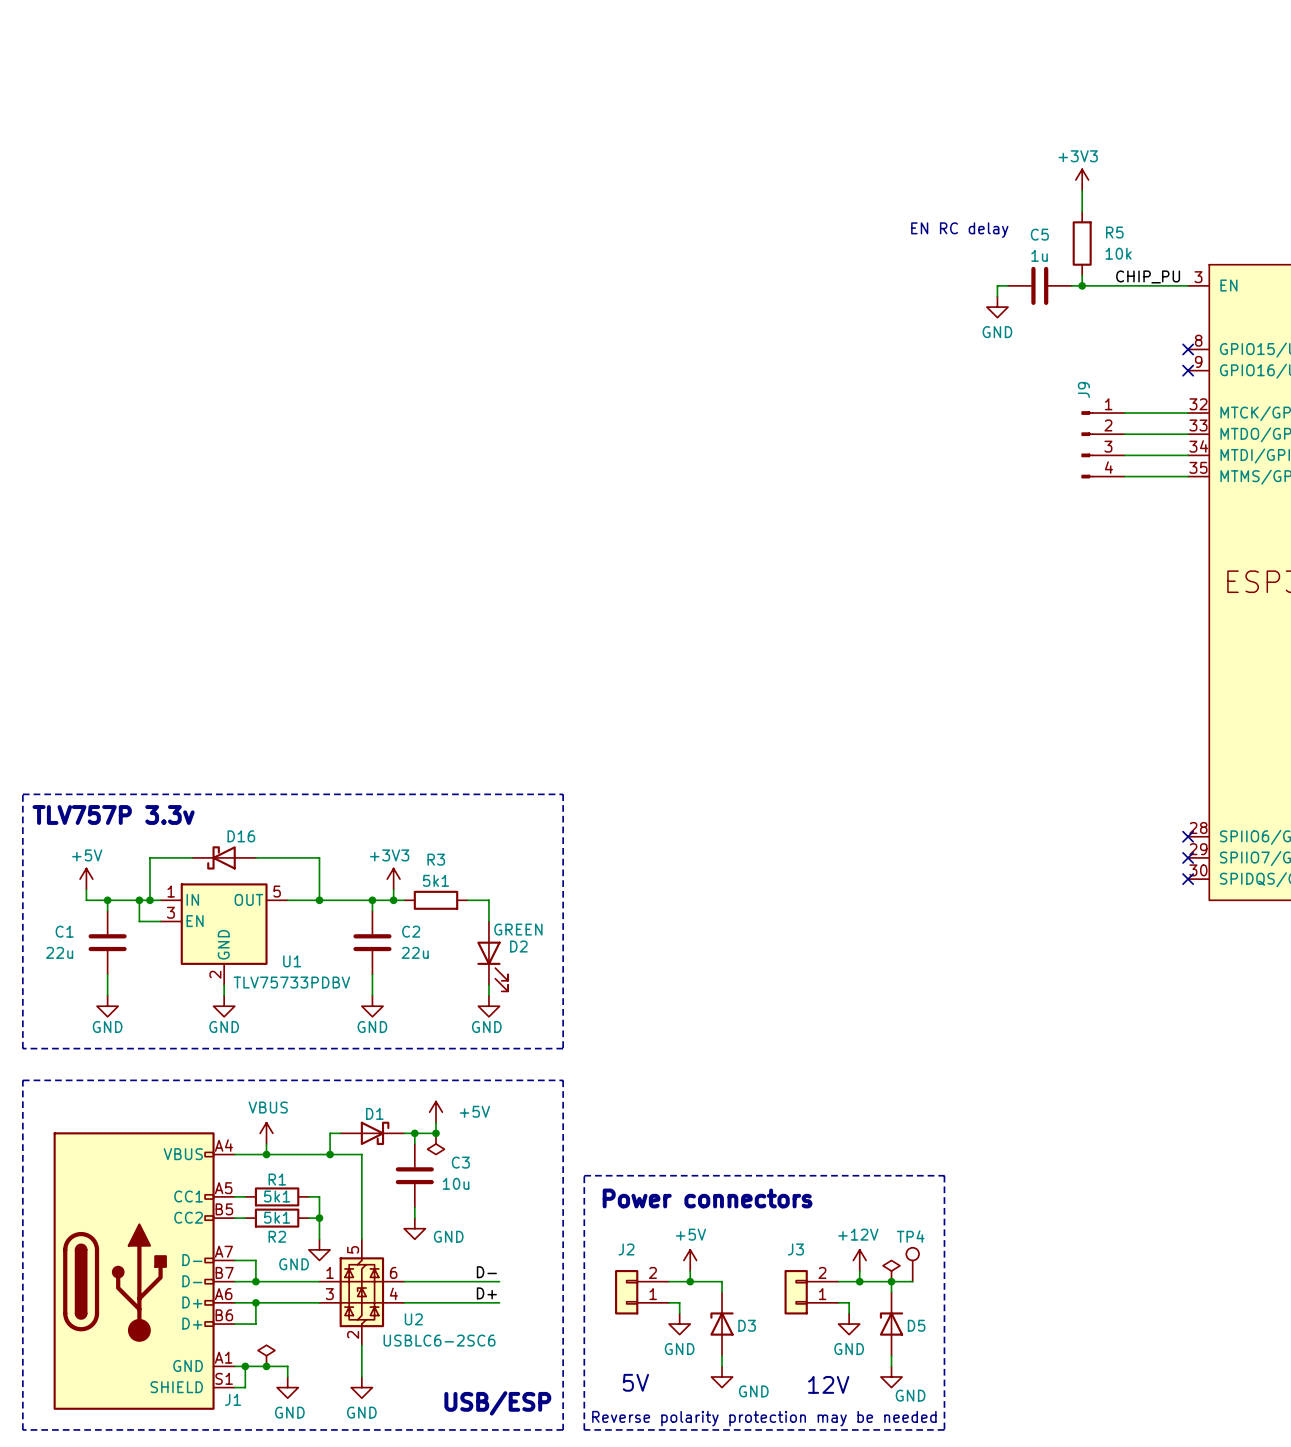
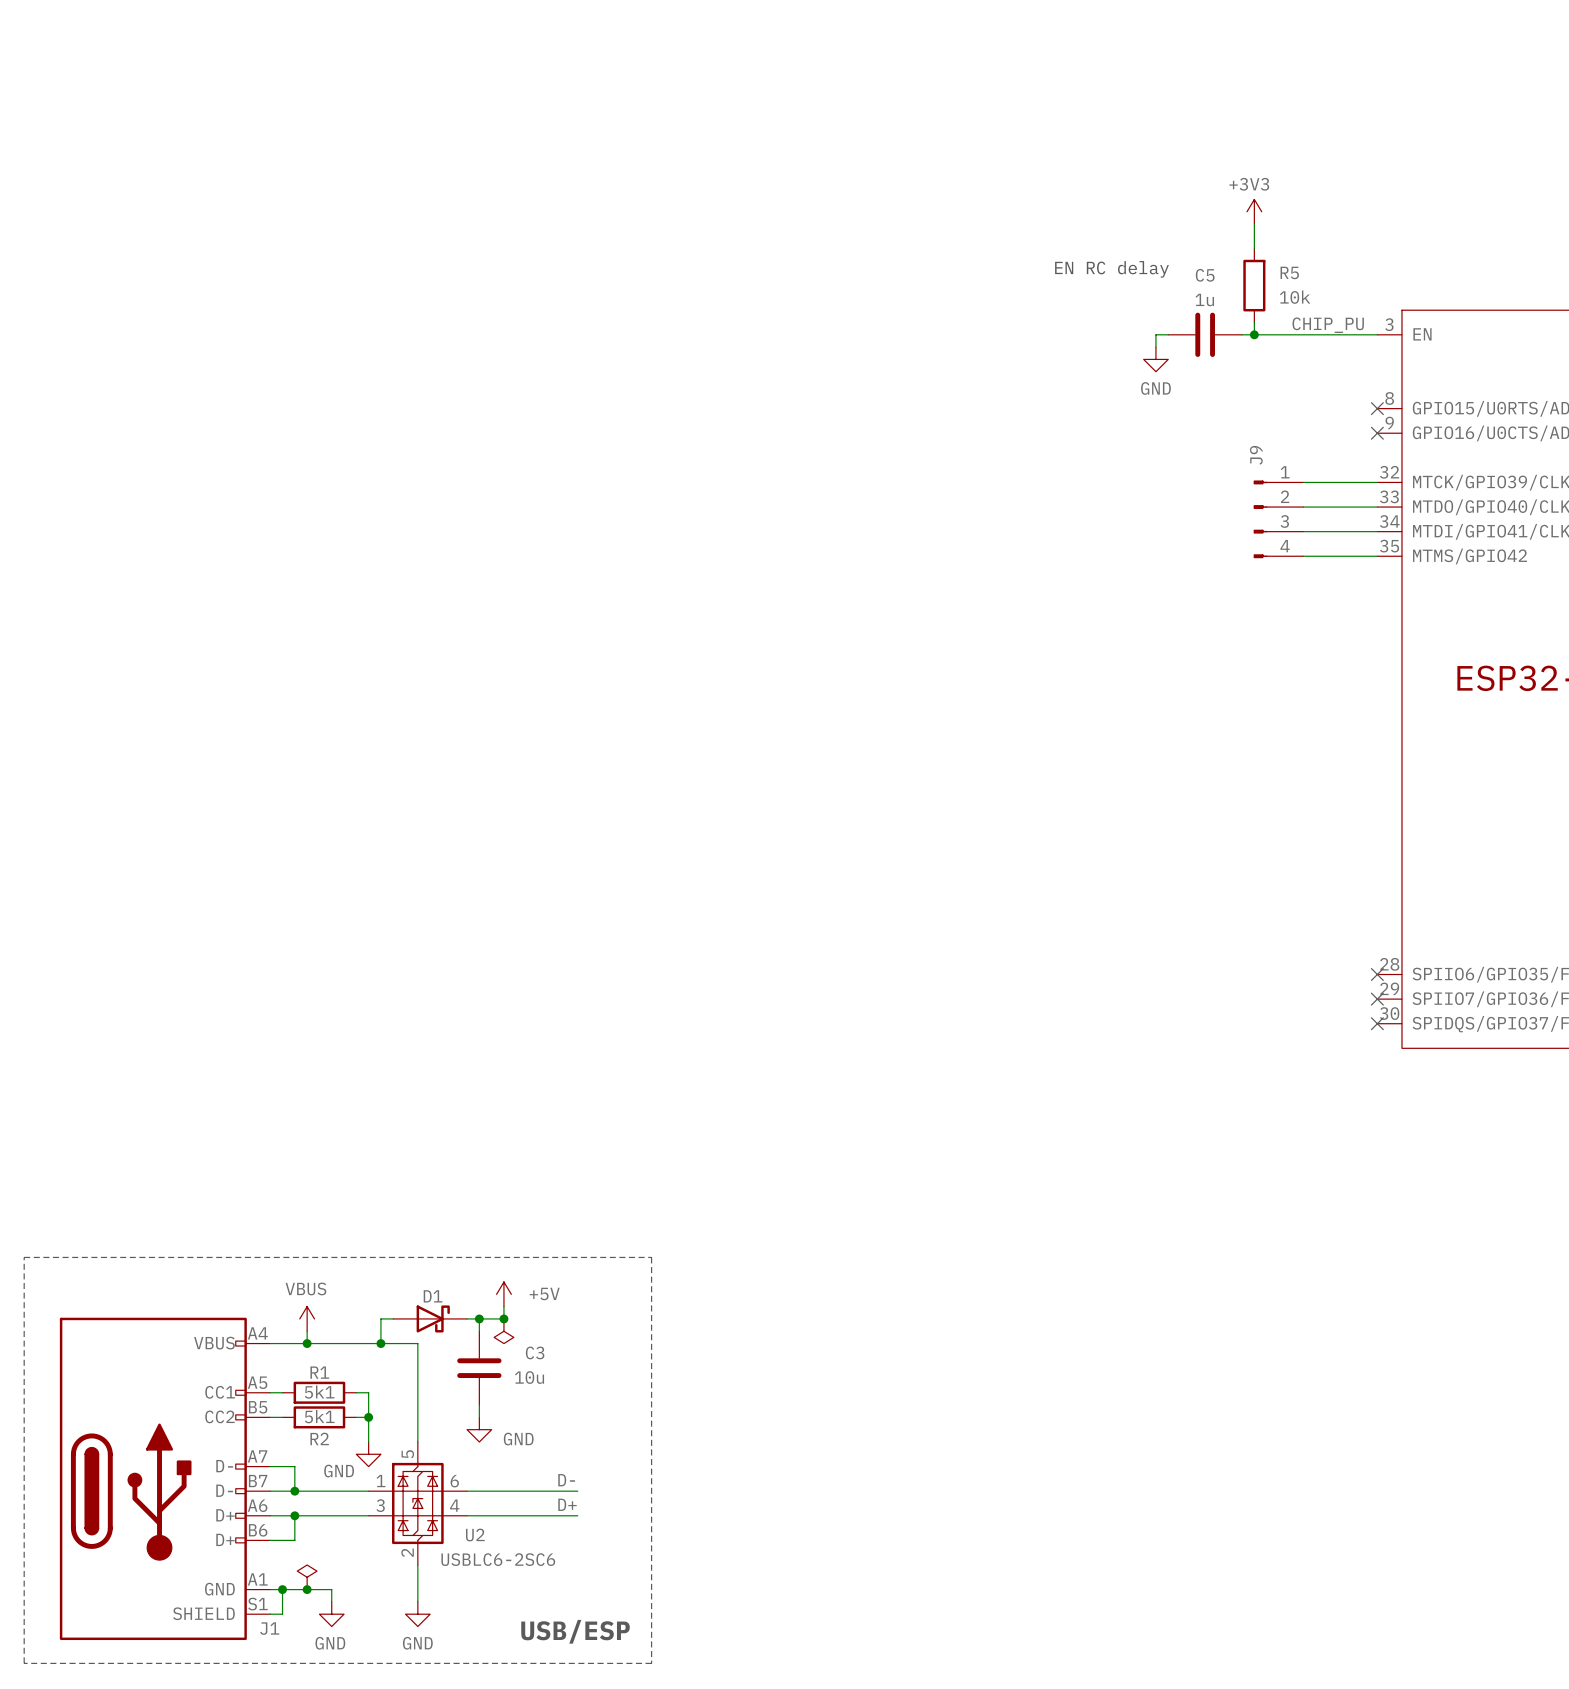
line: (22, 794) (563, 794) (563, 1048) (22, 1048) (22, 794) -> none
text: TLV757P 3.3v (113, 814) -> none
wire: (192, 857) (149, 857) (149, 900) -> none
D16: (224, 857) -> none
wire: (255, 857) (319, 857) (319, 900) -> none
power symbol: +5V (86, 879) -> none
power symbol: +3V3 (393, 879) -> none
wire: (86, 889) (86, 900) (160, 900) -> none
wire: (393, 889) (393, 900) -> none
wire: (107, 900) (107, 910) -> none
junction: (107, 900) -> none
wire: (139, 900) (139, 921) (160, 921) -> none
junction: (139, 900) -> none
junction: (149, 900) -> none
wire: (287, 900) (404, 900) -> none
junction: (319, 900) -> none
wire: (372, 900) (372, 910) -> none
junction: (372, 900) -> none
junction: (393, 900) -> none
R3: 5k1 (436, 900) -> none
wire: (467, 900) (488, 900) (488, 921) -> none
U1: TLV75733PDBV (224, 934) -> none
C1: 22u (107, 942) -> none
C2: 22u (372, 942) -> none
D2: GREEN (492, 956) -> none
wire: (107, 974) (107, 995) -> none
wire: (372, 974) (372, 995) -> none
wire: (224, 985) (224, 995) -> none
wire: (488, 985) (488, 995) -> none
power symbol: GND (107, 1006) -> none
power symbol: GND (224, 1006) -> none
power symbol: GND (372, 1006) -> none
power symbol: GND (488, 1006) -> none
line: (584, 1175) (944, 1175) (944, 1429) (584, 1429) (584, 1175) -> none
text: Power connectors (707, 1198) -> none
power symbol: +5V (690, 1260) -> none
power symbol: +12V (859, 1260) -> none
TP4: (912, 1264) -> none
wire: (690, 1271) (690, 1281) -> none
wire: (859, 1271) (859, 1281) -> none
power symbol: (891, 1271) -> none
wire: (669, 1281) (722, 1281) (722, 1292) -> none
junction: (690, 1281) -> none
wire: (838, 1281) (912, 1281) -> none
junction: (859, 1281) -> none
wire: (891, 1281) (891, 1292) -> none
junction: (891, 1281) -> none
J2: (642, 1292) -> none
J3: (811, 1292) -> none
wire: (669, 1302) (679, 1302) (679, 1313) -> none
wire: (838, 1302) (849, 1302) (849, 1313) -> none
power symbol: GND (679, 1324) -> none
D3: (722, 1324) -> none
power symbol: GND (849, 1324) -> none
D5: (891, 1324) -> none
wire: (722, 1355) (722, 1366) -> none
wire: (891, 1355) (891, 1366) -> none
power symbol: GND (722, 1376) -> none
power symbol: GND (891, 1376) -> none
text: 5V (635, 1382) -> none
text: 12V (828, 1384) -> none
text: Reverse polarity protection may be needed (764, 1418) -> none

